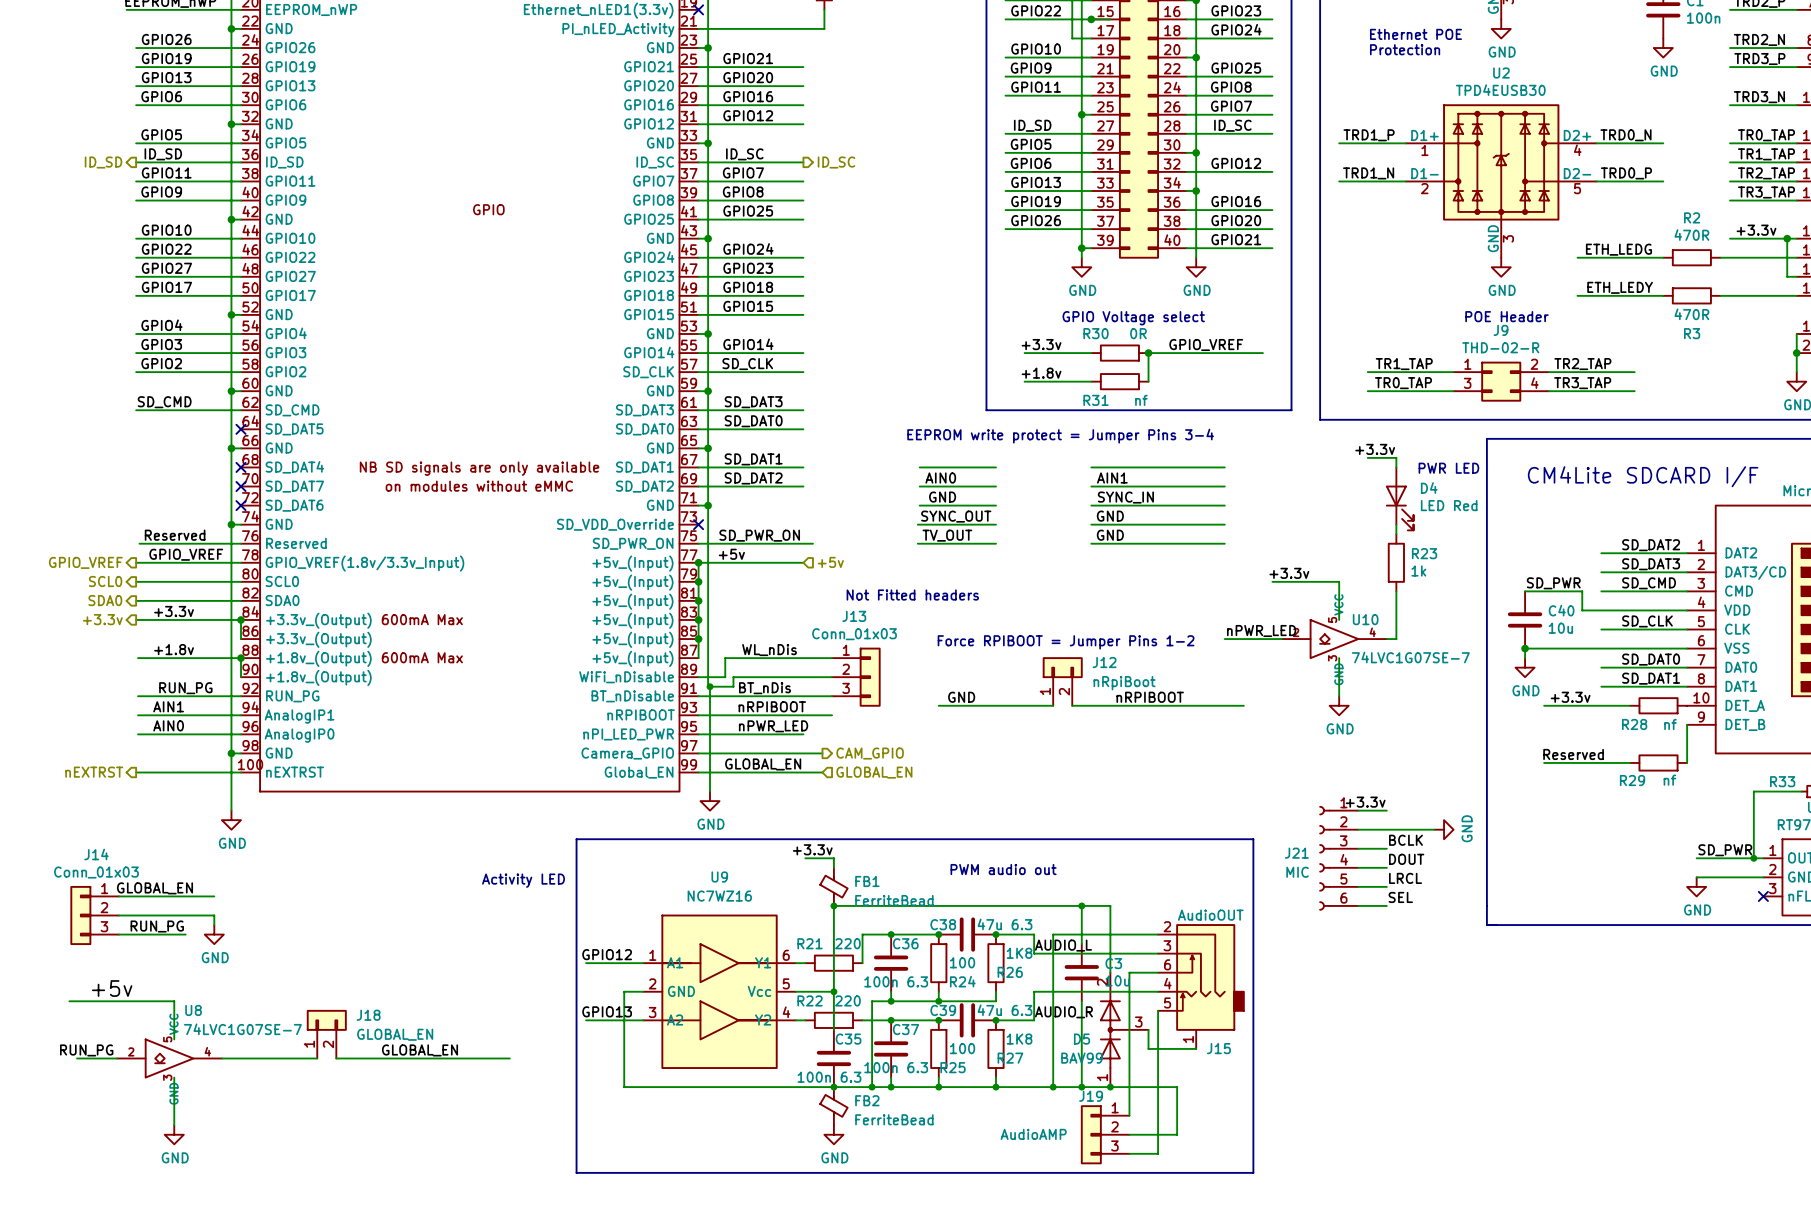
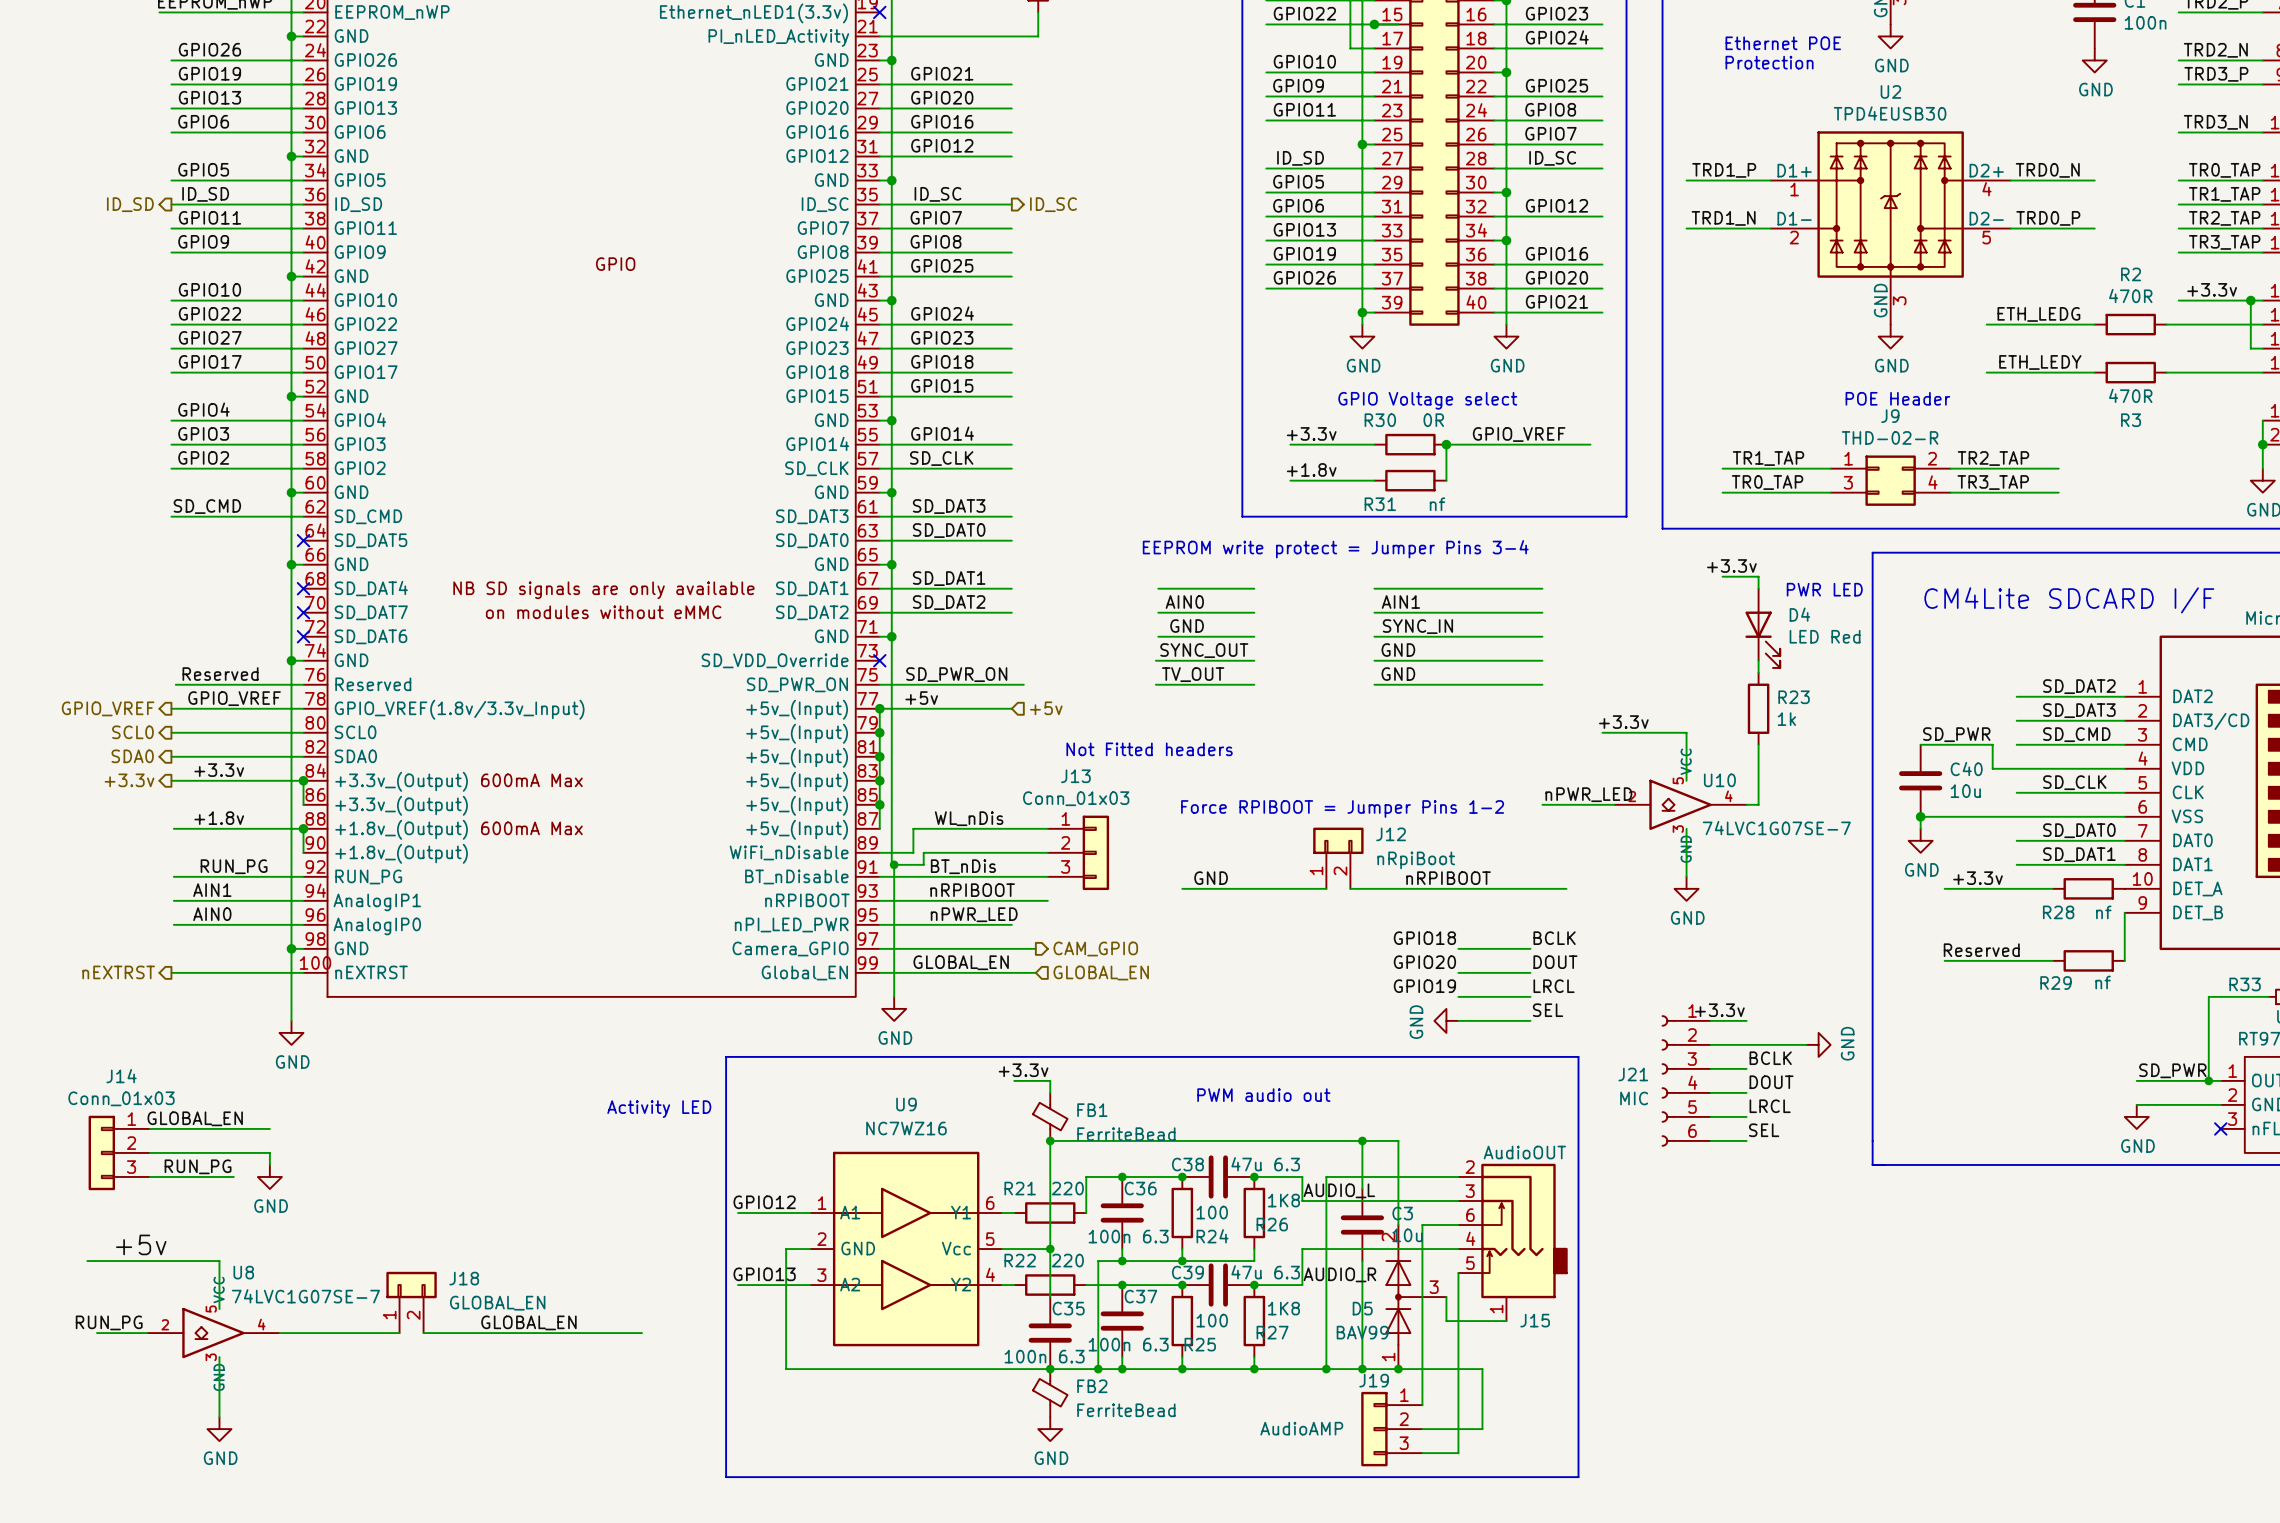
label: none -> GPIO18 (1424, 938)
label: none -> BCLK (1554, 938)
wire: none -> (1458, 948) (1530, 948)
label: none -> GPIO20 (1424, 962)
label: none -> DOUT (1555, 962)
wire: none -> (1458, 972) (1530, 972)
label: none -> GPIO19 (1424, 986)
label: none -> LRCL (1554, 986)
wire: none -> (1458, 996) (1530, 996)
label: none -> SEL (1548, 1010)
power symbol: none -> GND (1446, 1020)
wire: none -> (1458, 1020) (1530, 1020)

